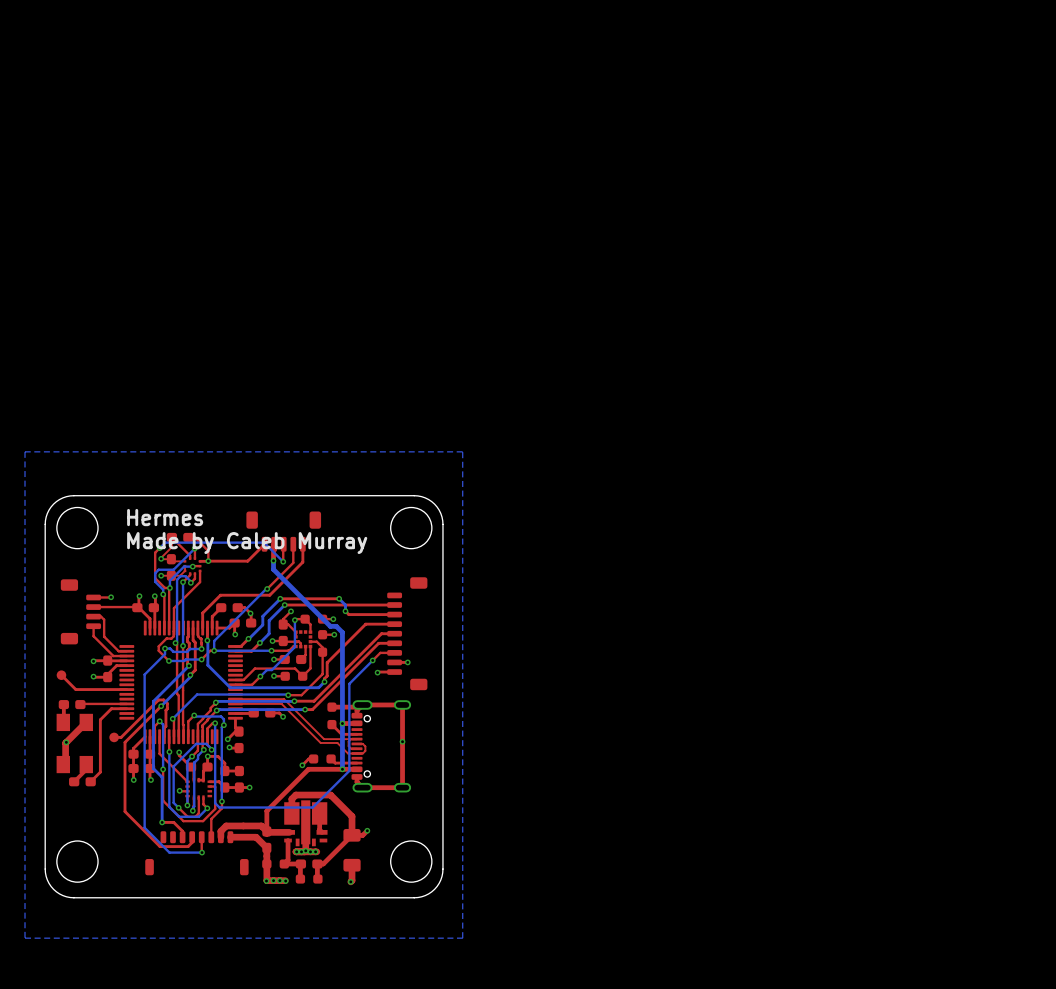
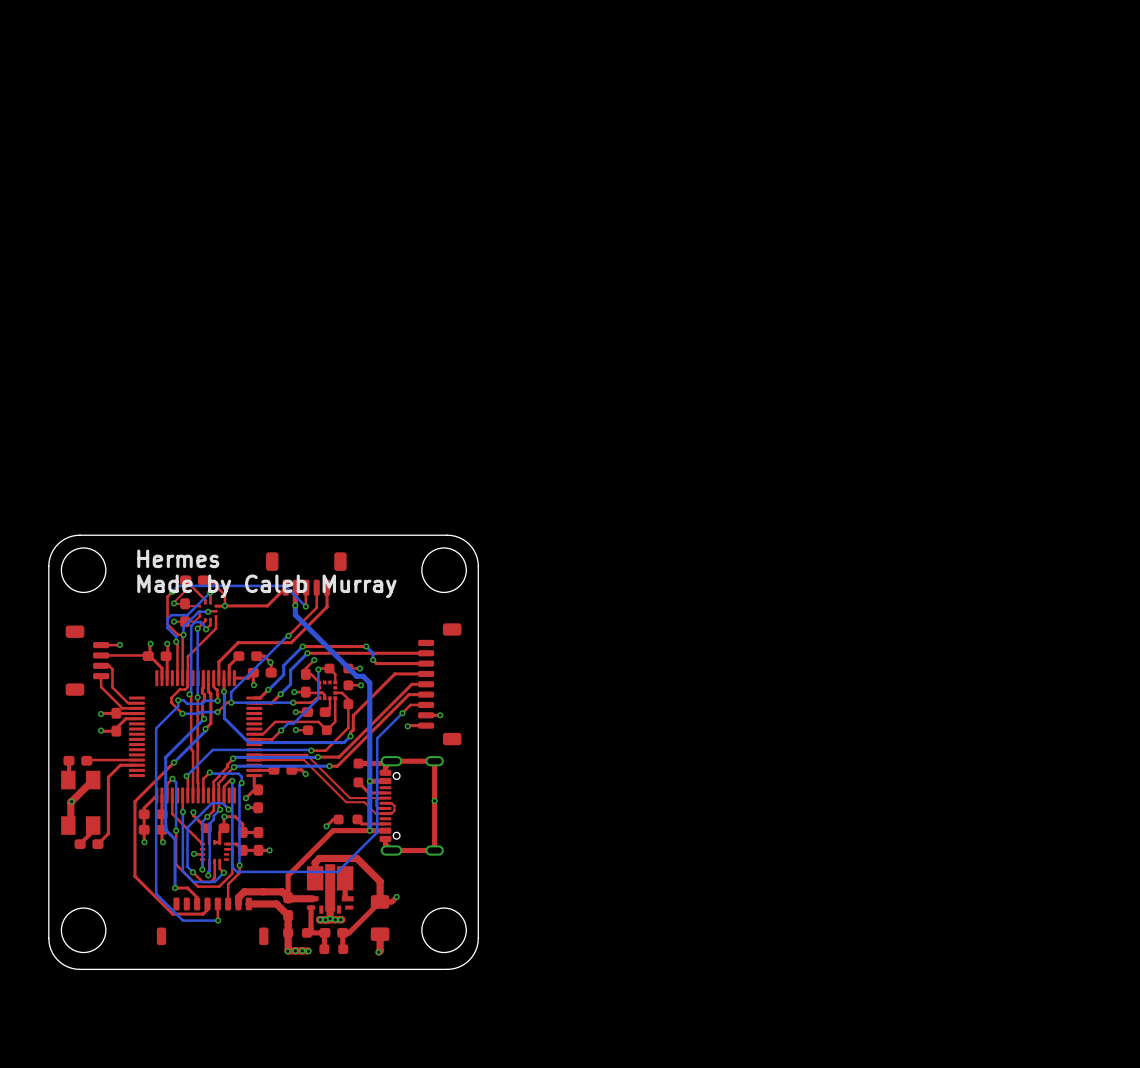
bottom zone outline: (462, 451) (25, 451) (25, 938) (462, 938) (462, 451) -> none
top track: (61, 675) (75, 689) (126, 689) -> none
part: (61, 675) -> none
top track: (164, 736) (167, 703) (163, 699) (158, 699) (121, 737) (114, 737) -> none
part: (114, 737) -> none

